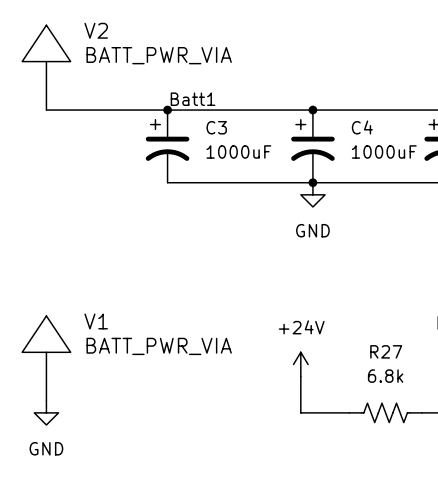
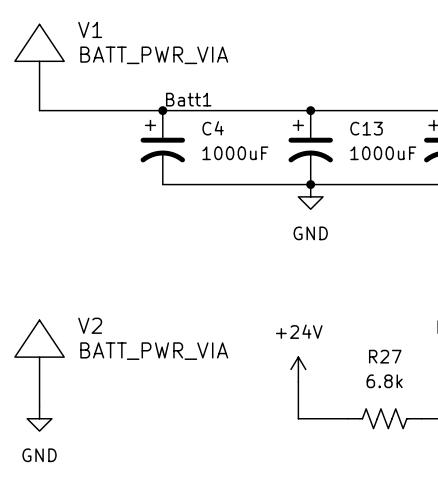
V2 name: V2 (96, 30) -> V1 (90, 29)
C3 name: C3 (216, 127) -> C4 (213, 128)
C4 name: C4 (362, 127) -> C13 (366, 128)
V1 name: V1 (96, 321) -> V2 (90, 325)

